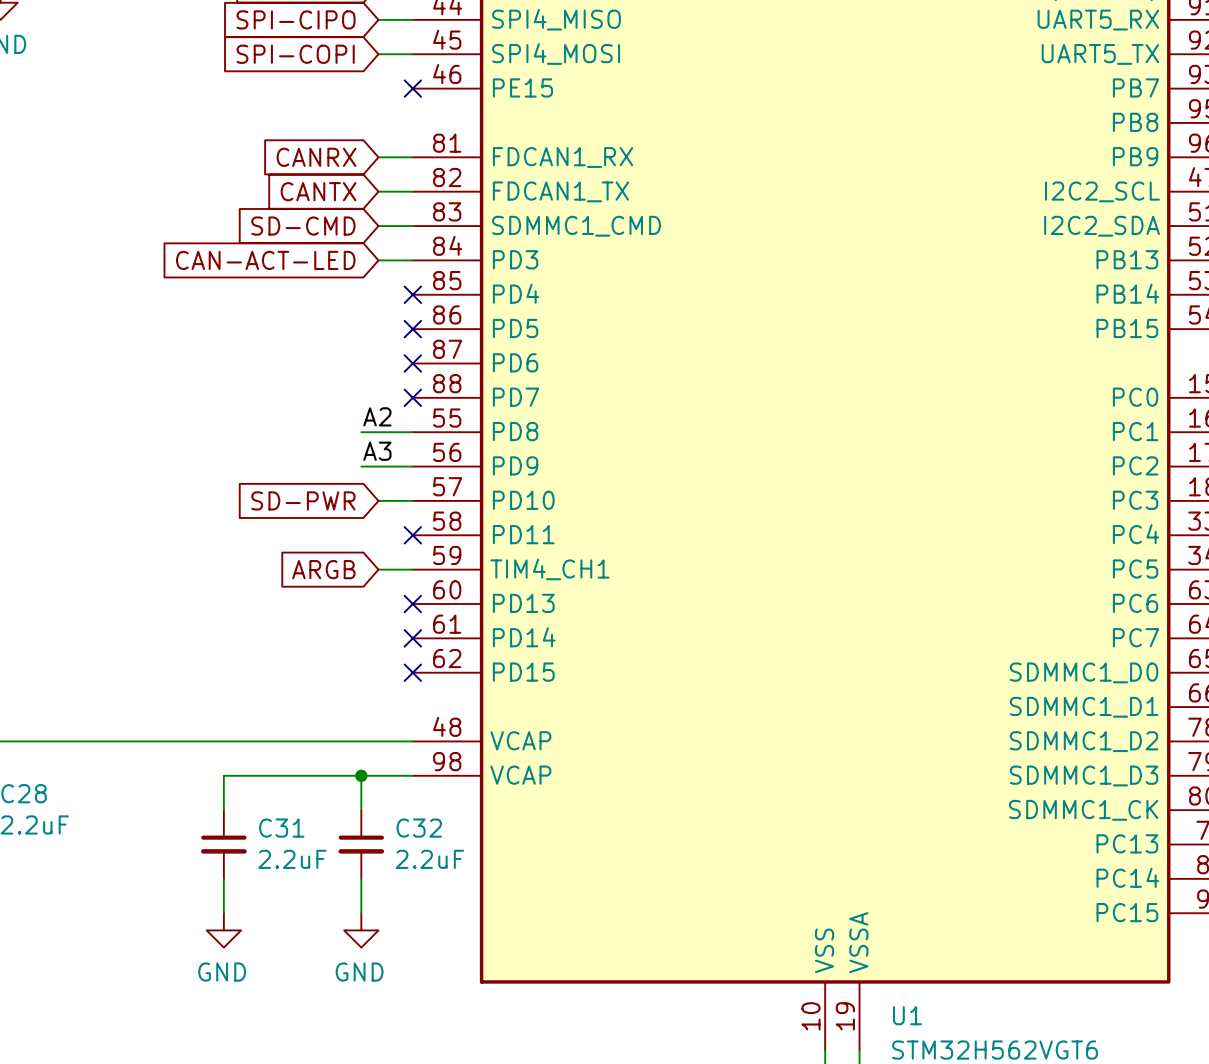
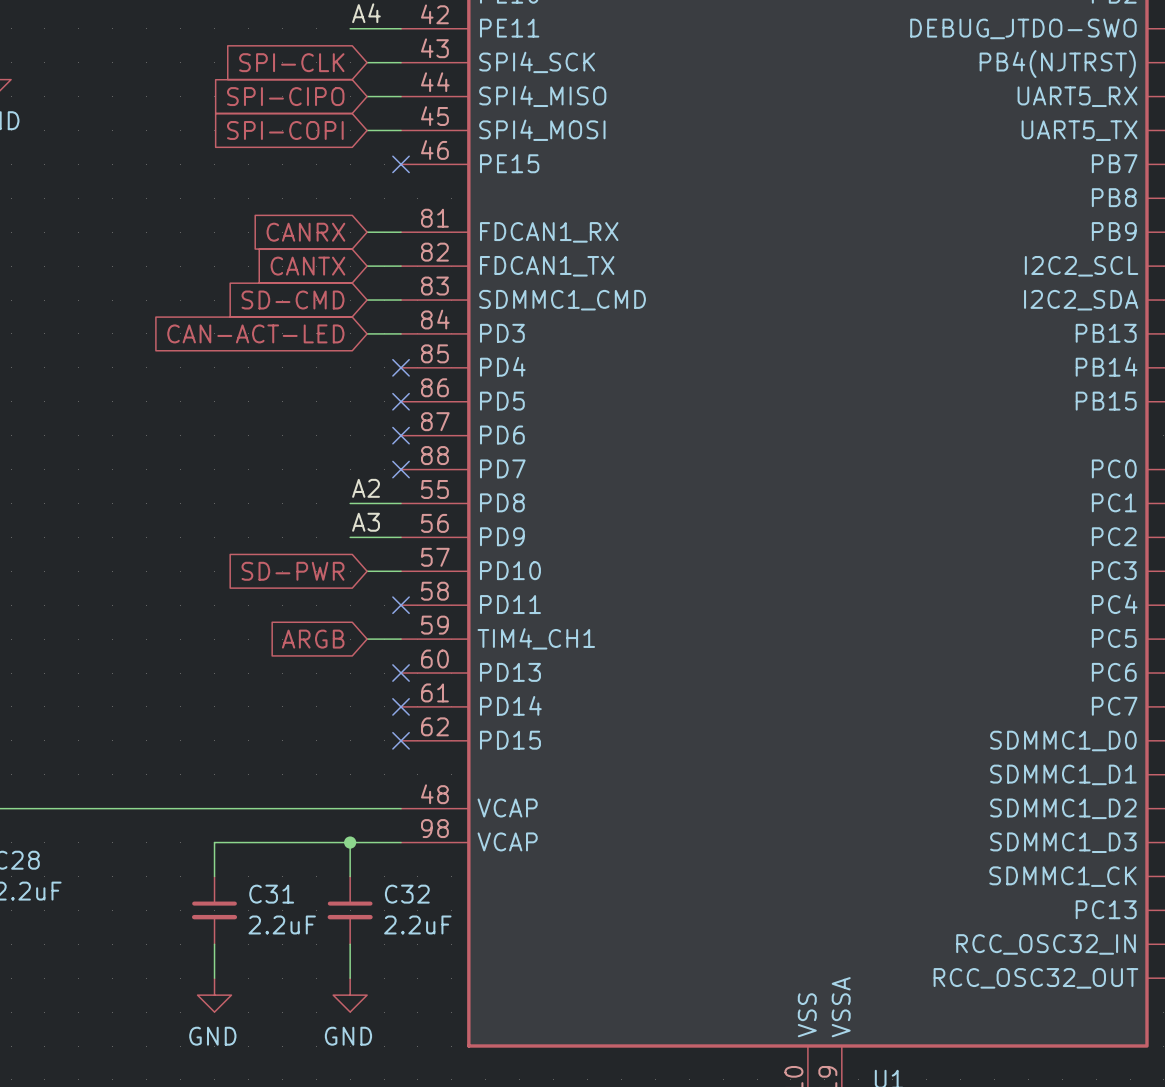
U1 pin name: PC14 (1127, 877) -> RCC_OSC32_IN (1046, 944)
U1 pin name: PC15 (1127, 912) -> RCC_OSC32_OUT (1035, 978)

